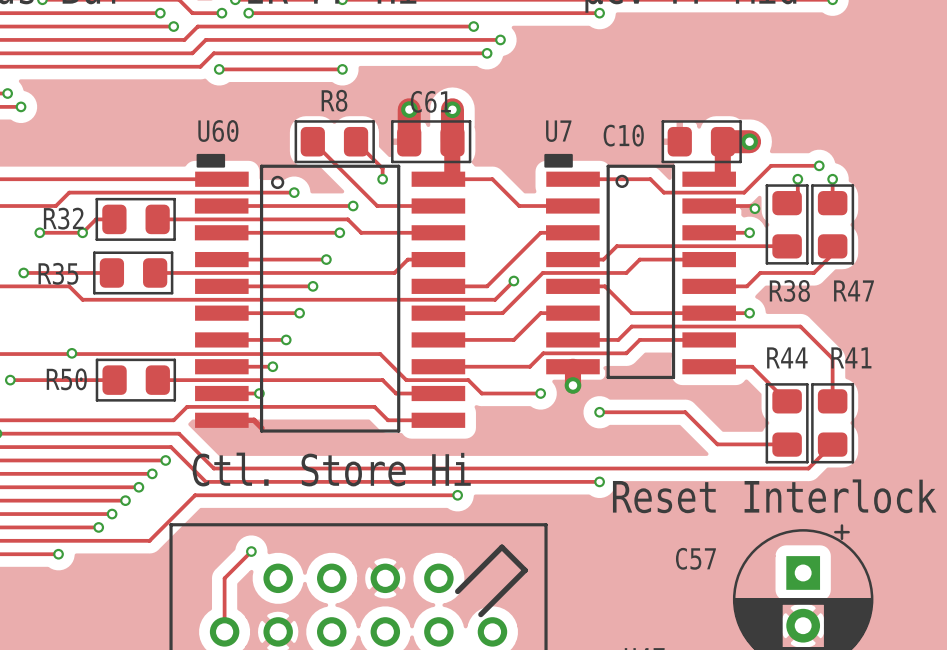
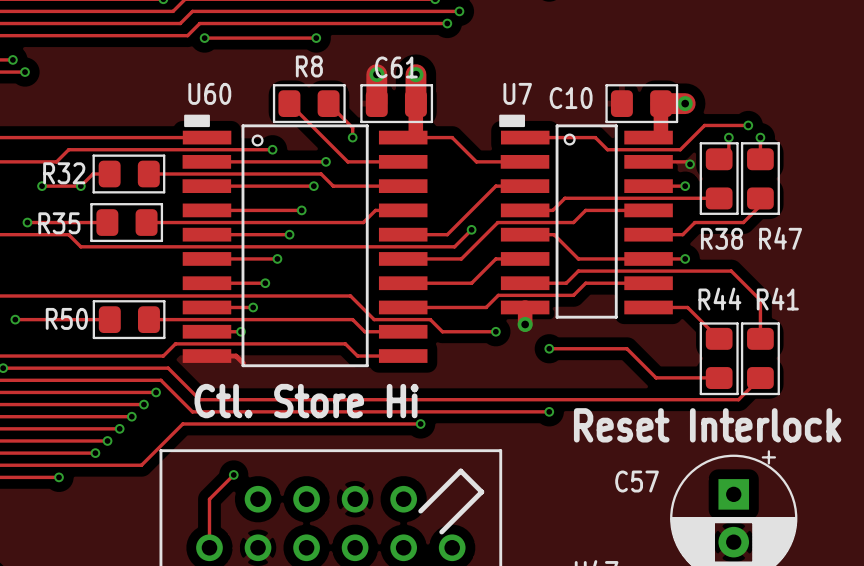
via: (71, 353) -> none

